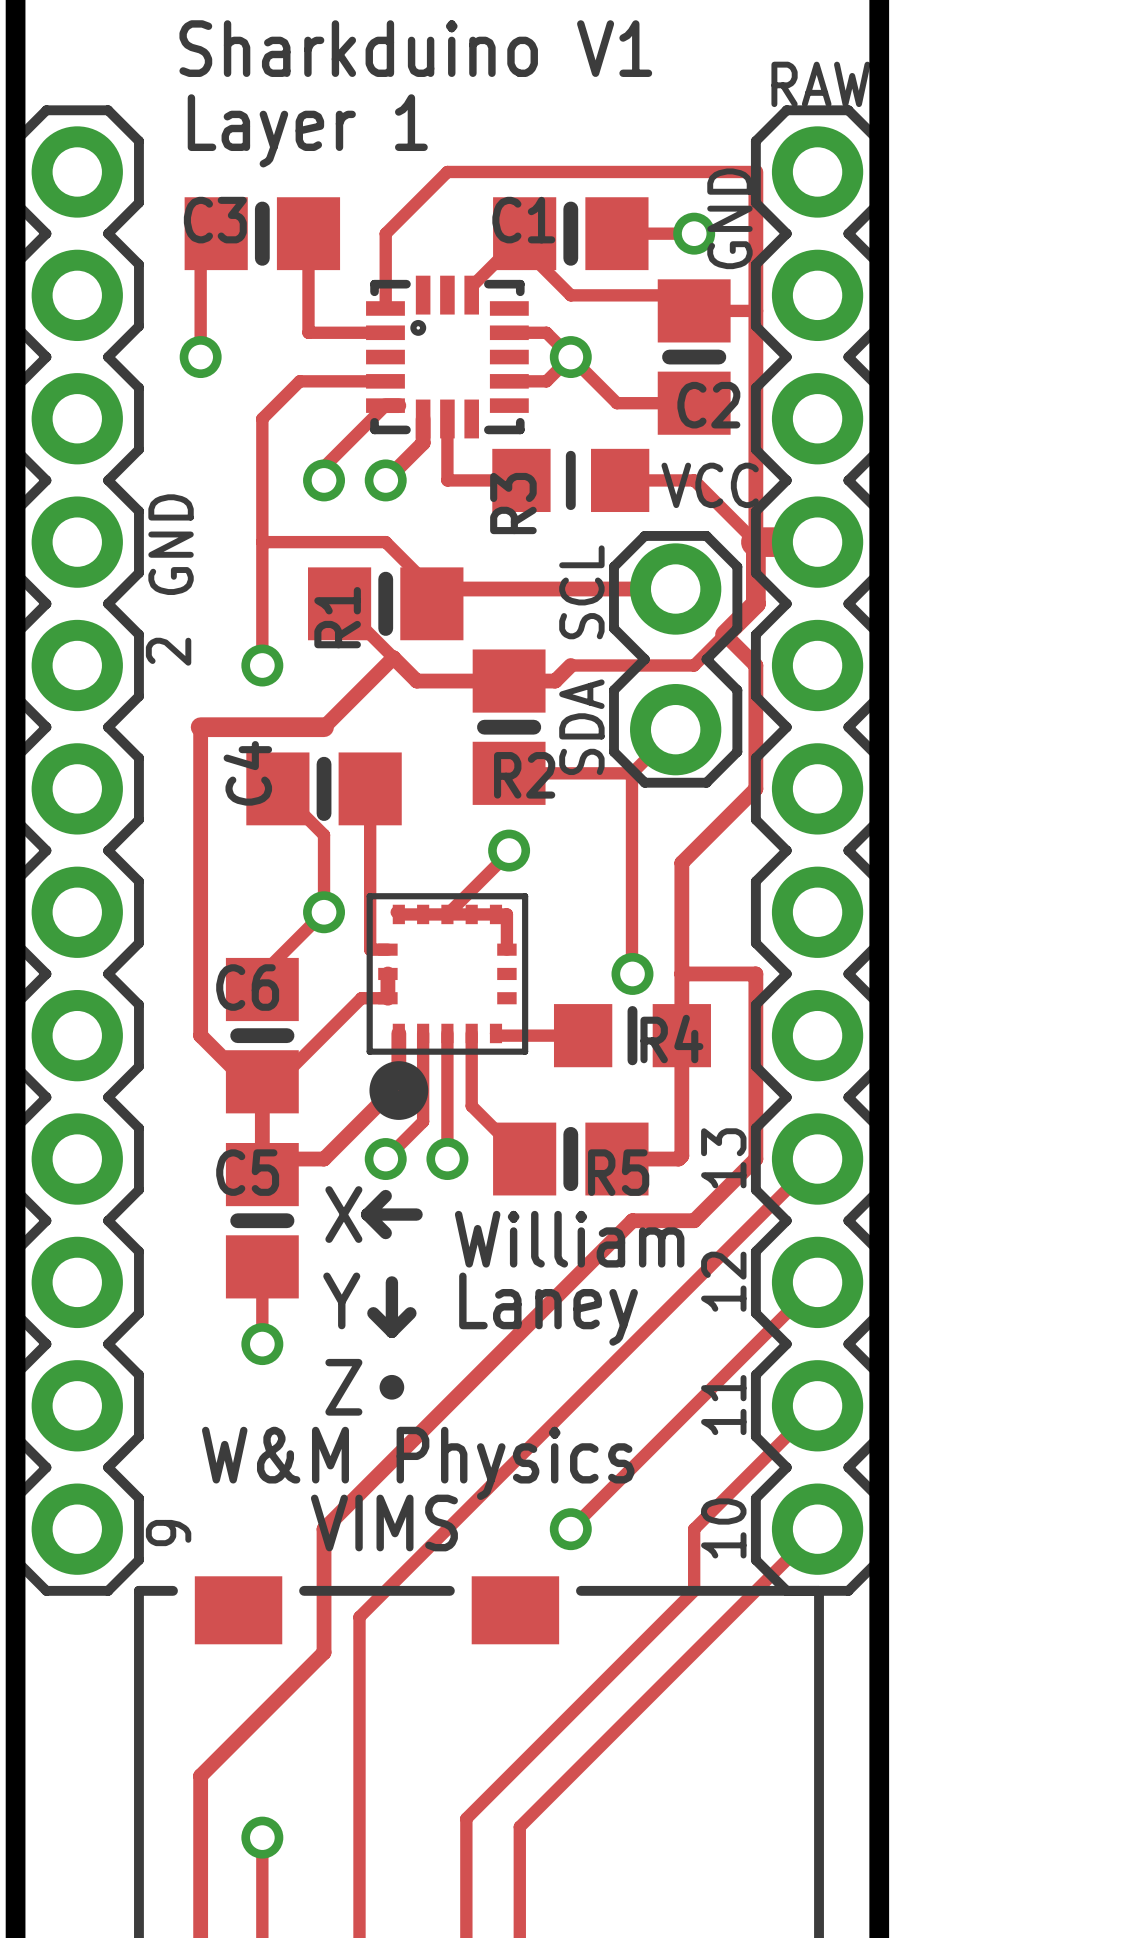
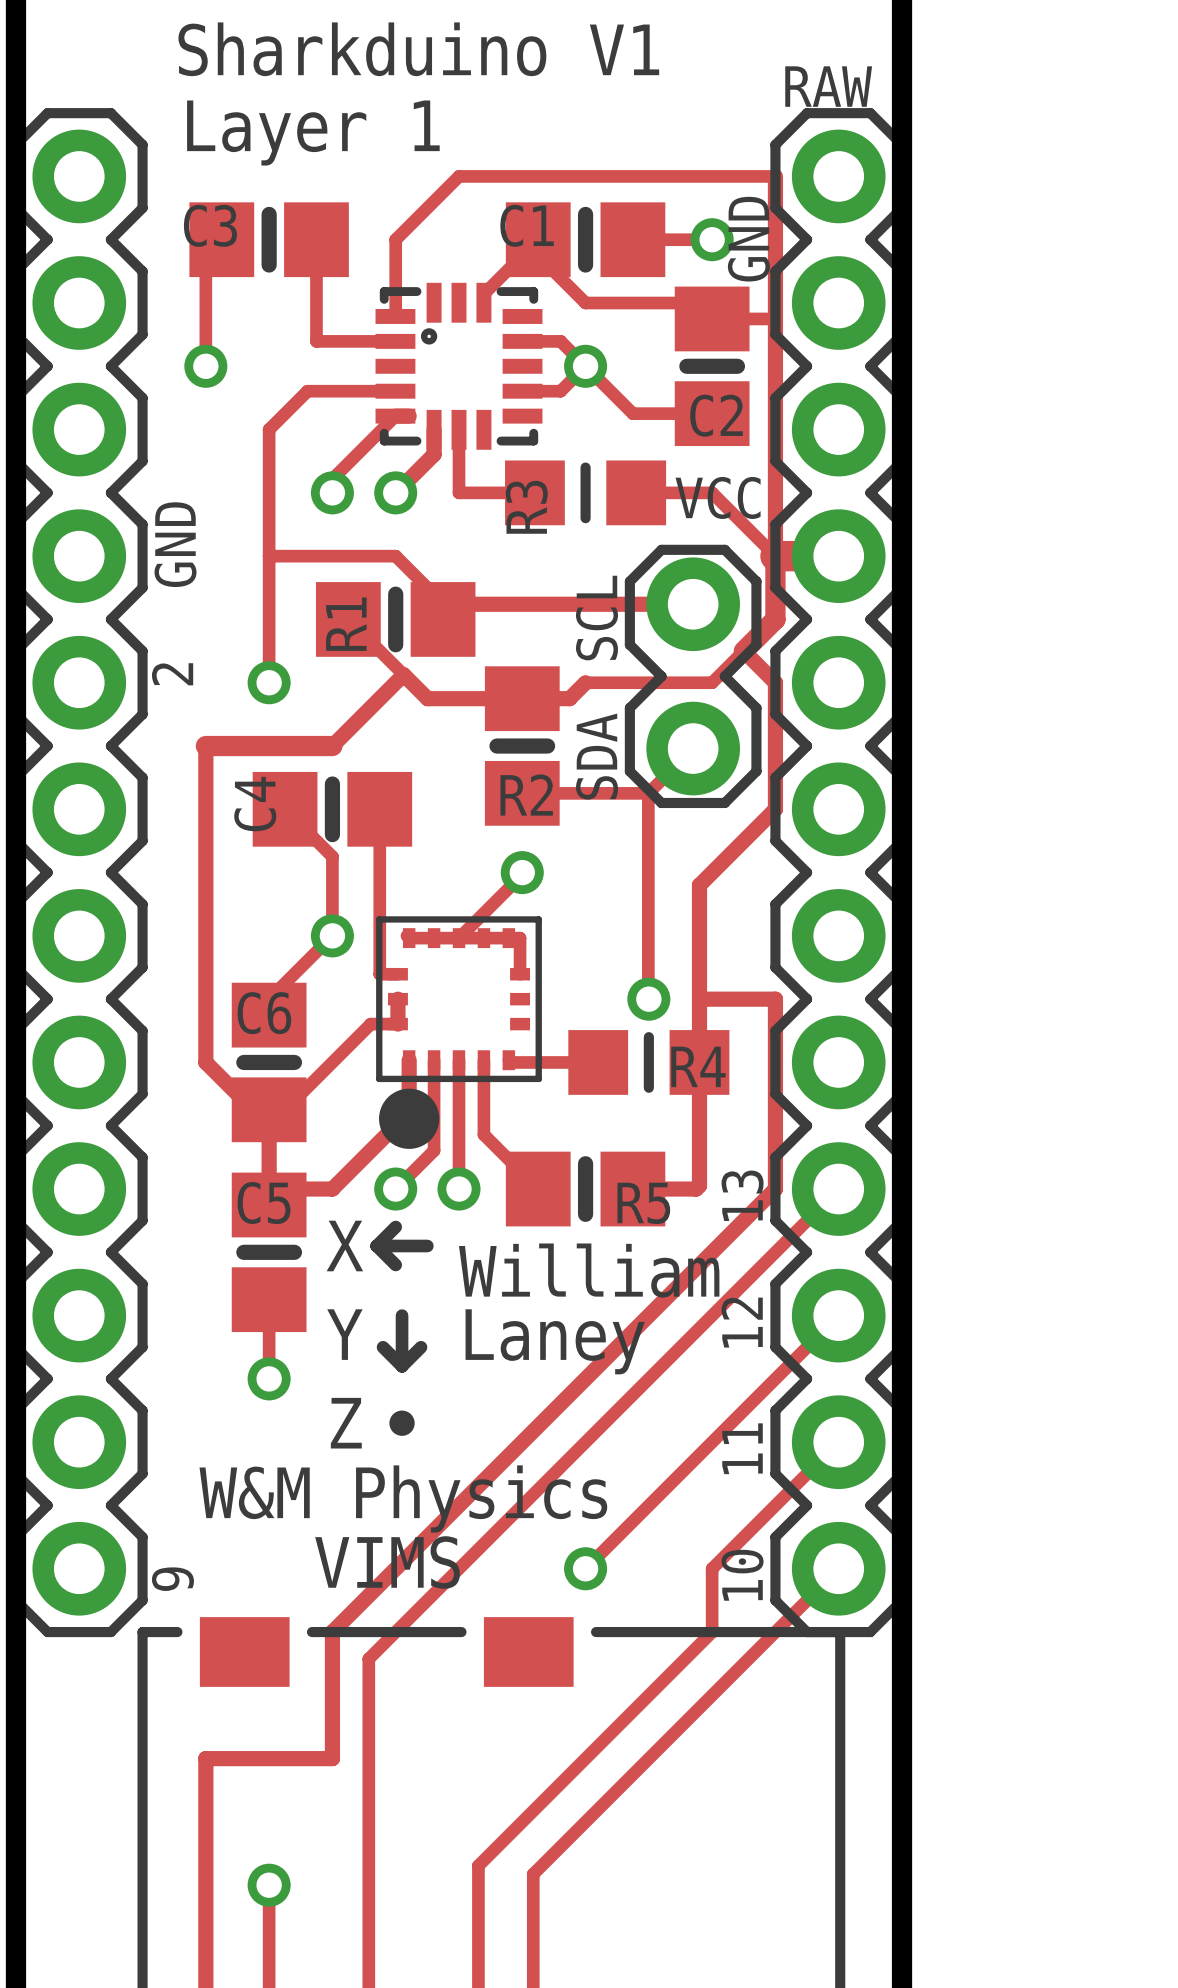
track: (694, 1220) (632, 1220) (324, 1529) (324, 1590) -> (712, 1252) (332, 1632)
track: (324, 1652) (200, 1775) -> (332, 1695) (332, 1758) (205, 1758) (205, 1821)

